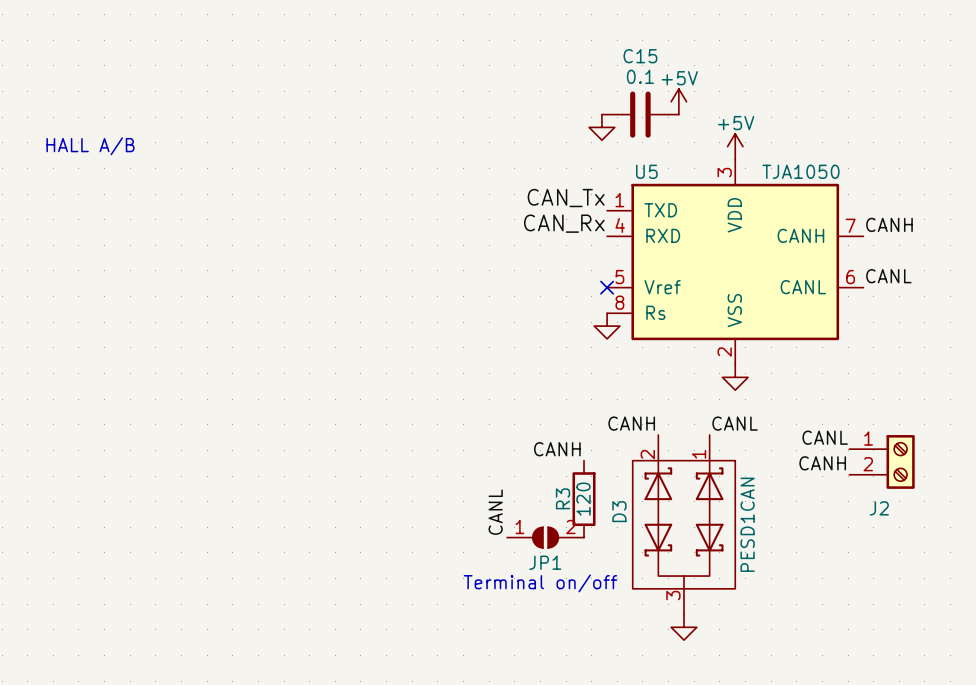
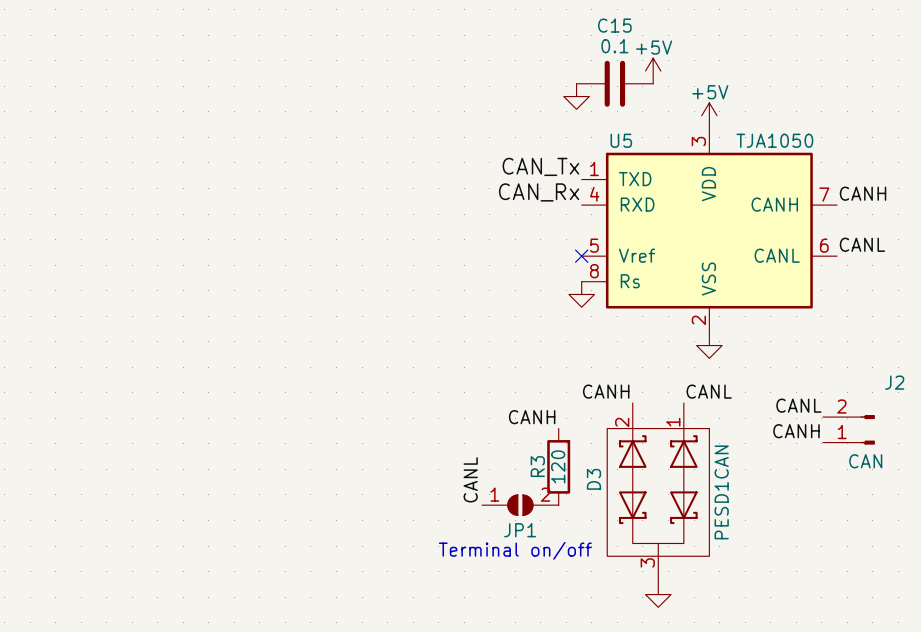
text: HALL A/B (90, 146) -> none
J2 symbol: [849, 435, 915, 489] -> [823, 415, 875, 445]
J2 value: none -> CAN (865, 461)
J2 name position: J2 (879, 508) -> J2 (894, 382)

